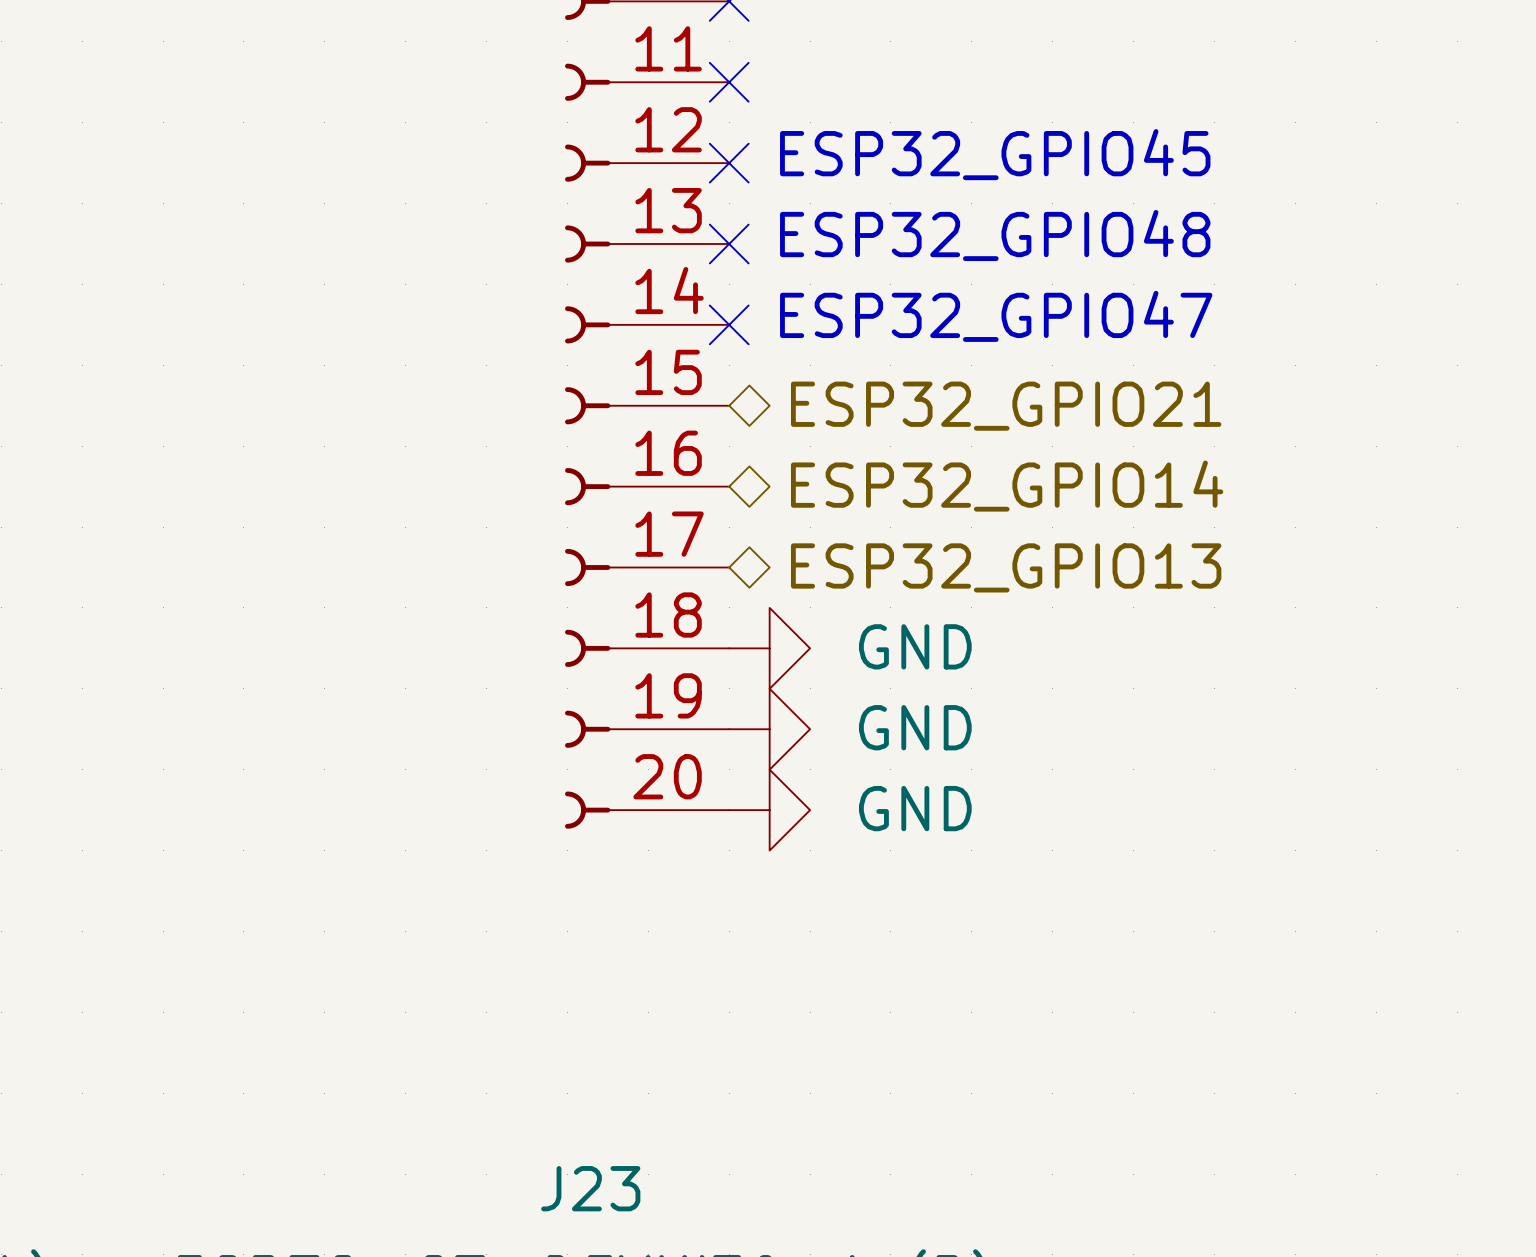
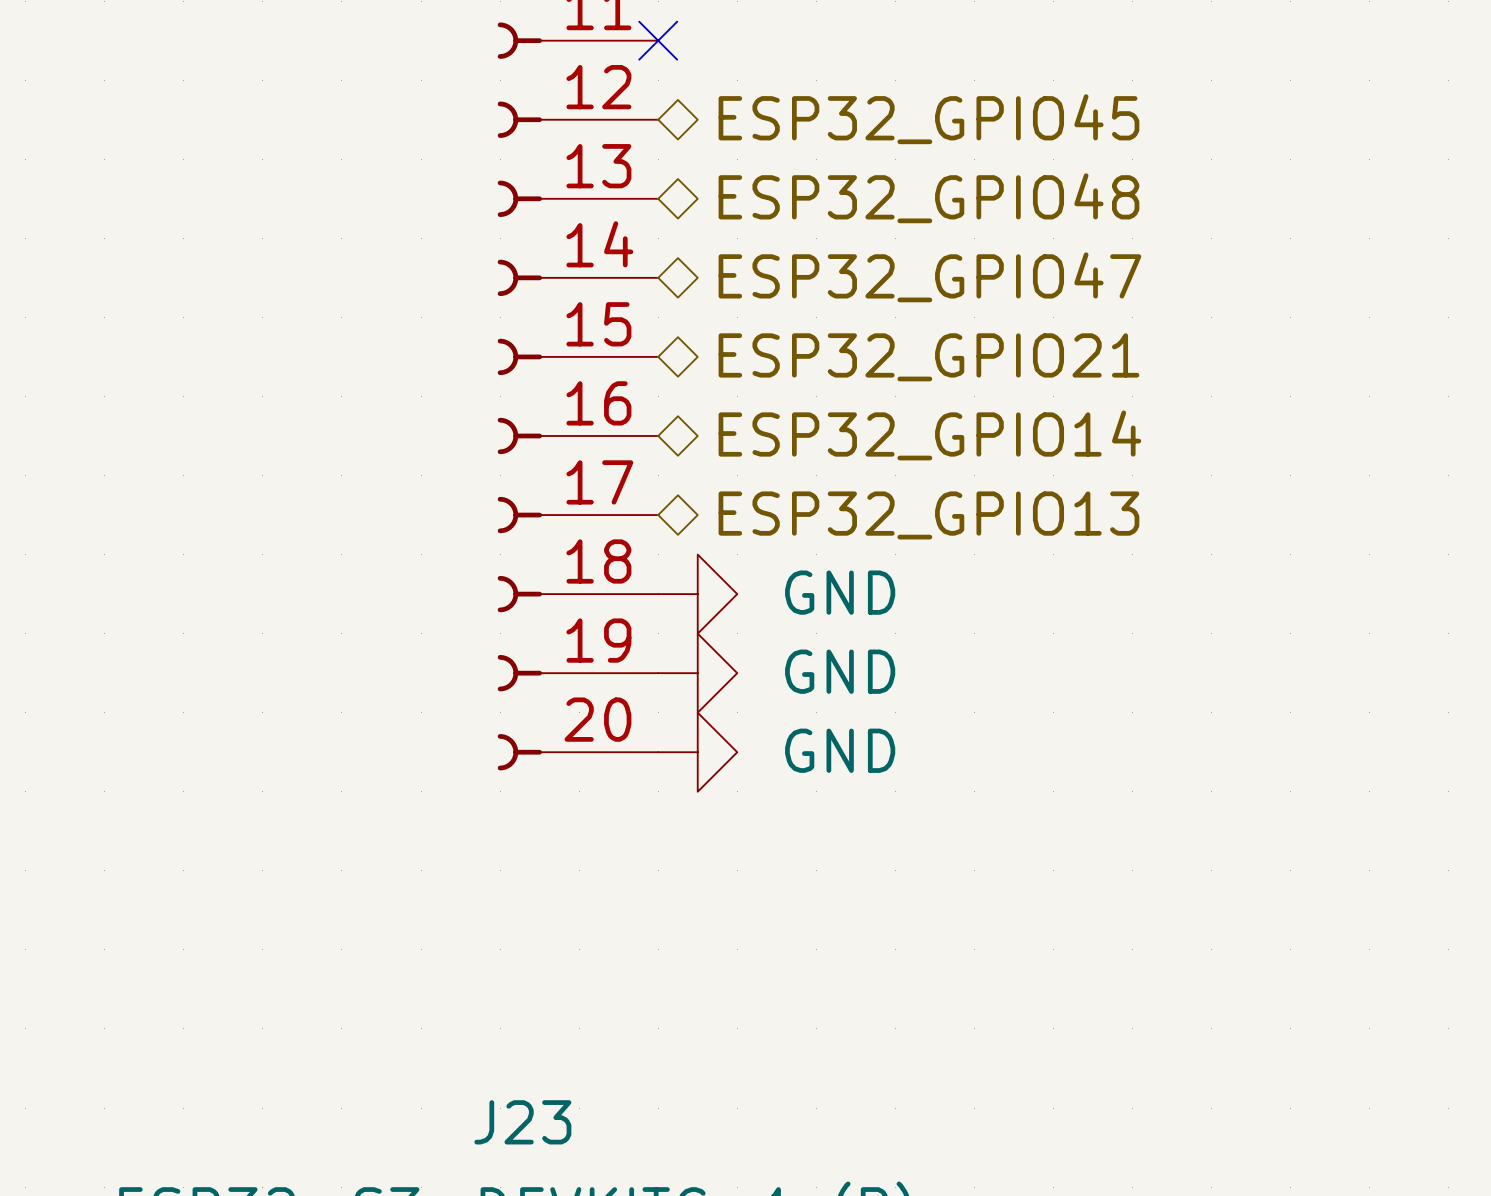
text: ESP32_GPIO45 (995, 154) -> none
hierarchical label: none -> ESP32_GPIO45 (928, 119)
no-connect mark: (729, 163) -> none
text: ESP32_GPIO48 (995, 235) -> none
hierarchical label: none -> ESP32_GPIO48 (928, 198)
no-connect mark: (729, 244) -> none
text: ESP32_GPIO47 (996, 316) -> none
no-connect mark: (729, 324) -> none
hierarchical label: none -> ESP32_GPIO47 (929, 277)

